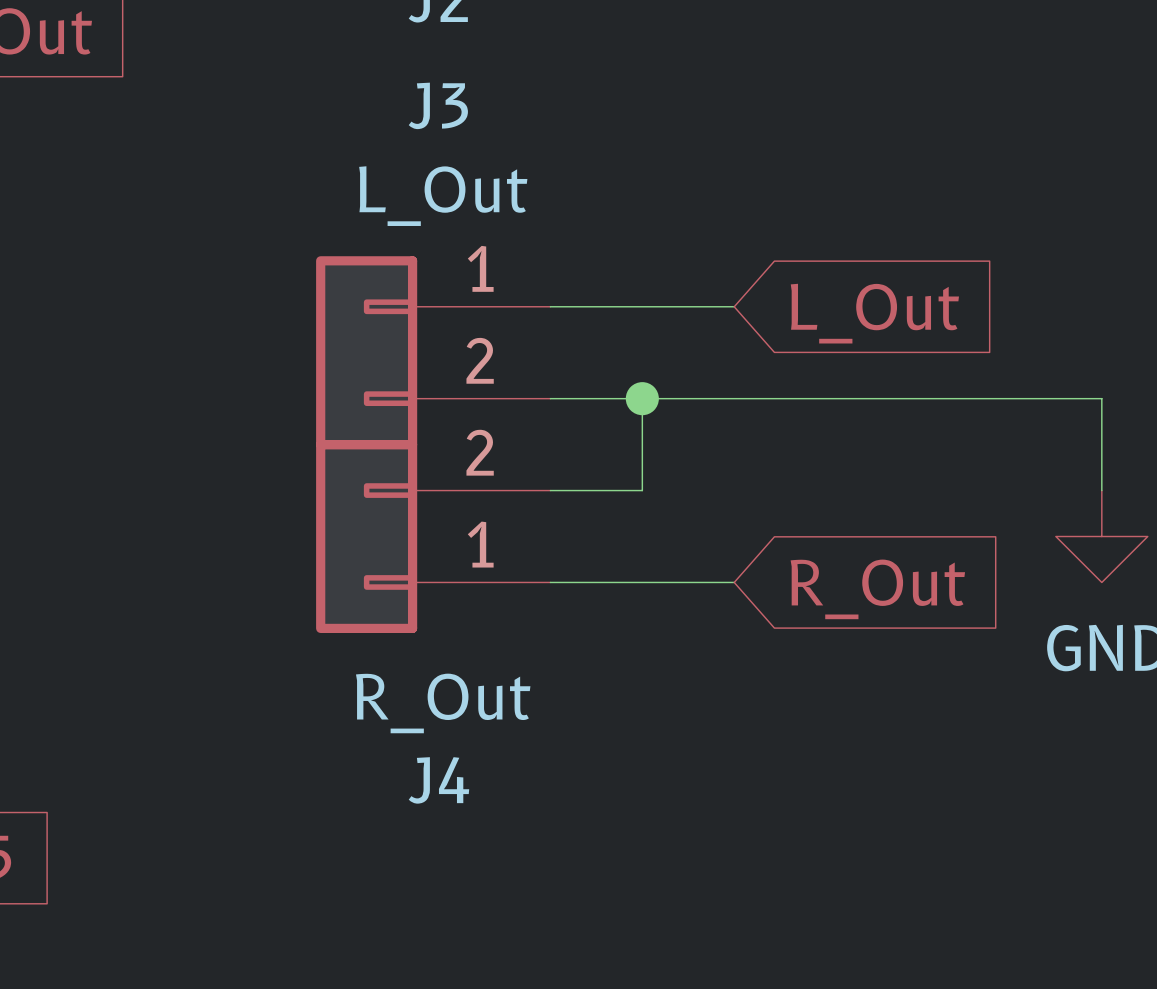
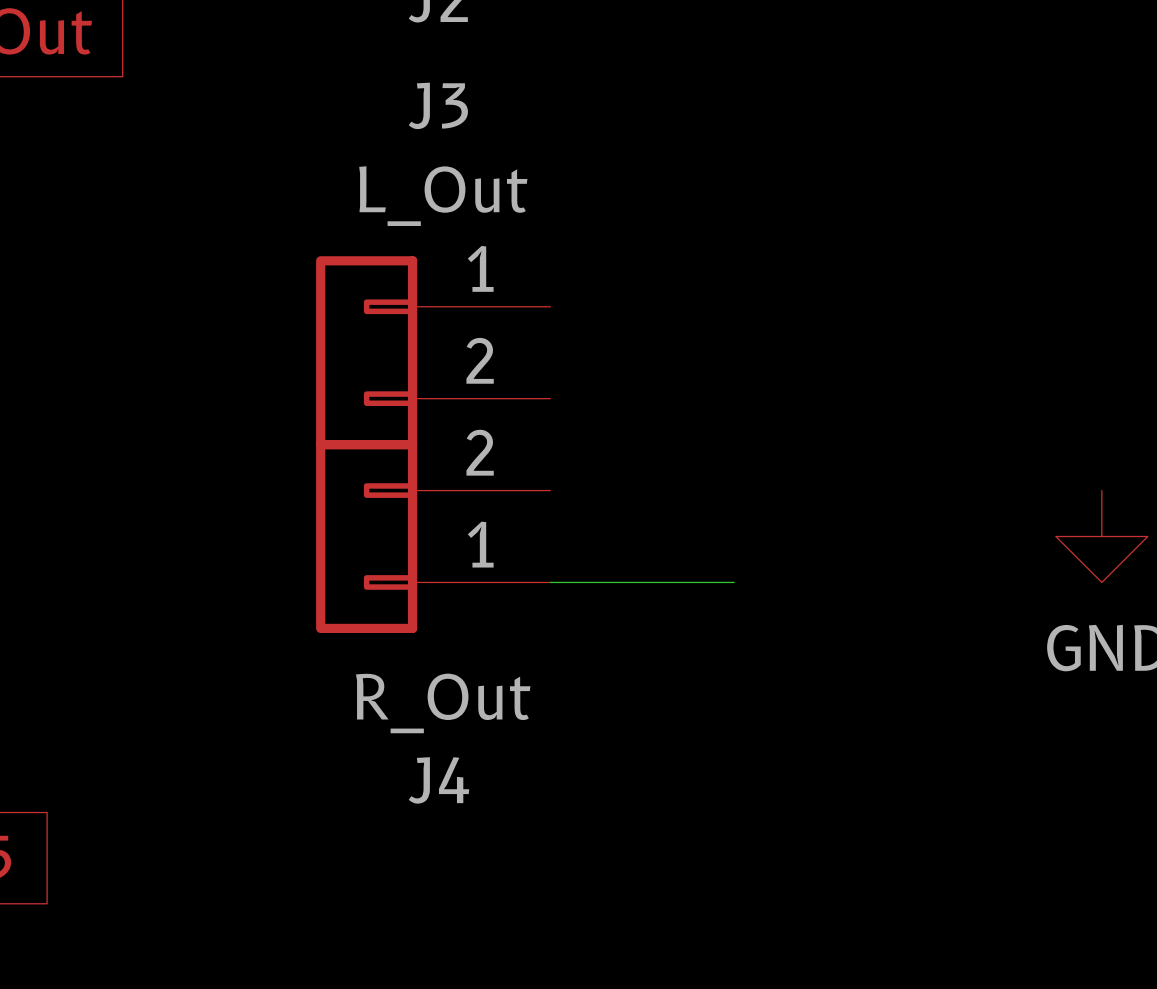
wire: (550, 306) (734, 306) -> none
global label: L_Out (874, 313) -> none
wire: (550, 398) (1101, 398) (1101, 490) -> none
wire: (642, 398) (642, 490) (550, 490) -> none
junction: (642, 398) -> none
global label: R_Out (877, 589) -> none

